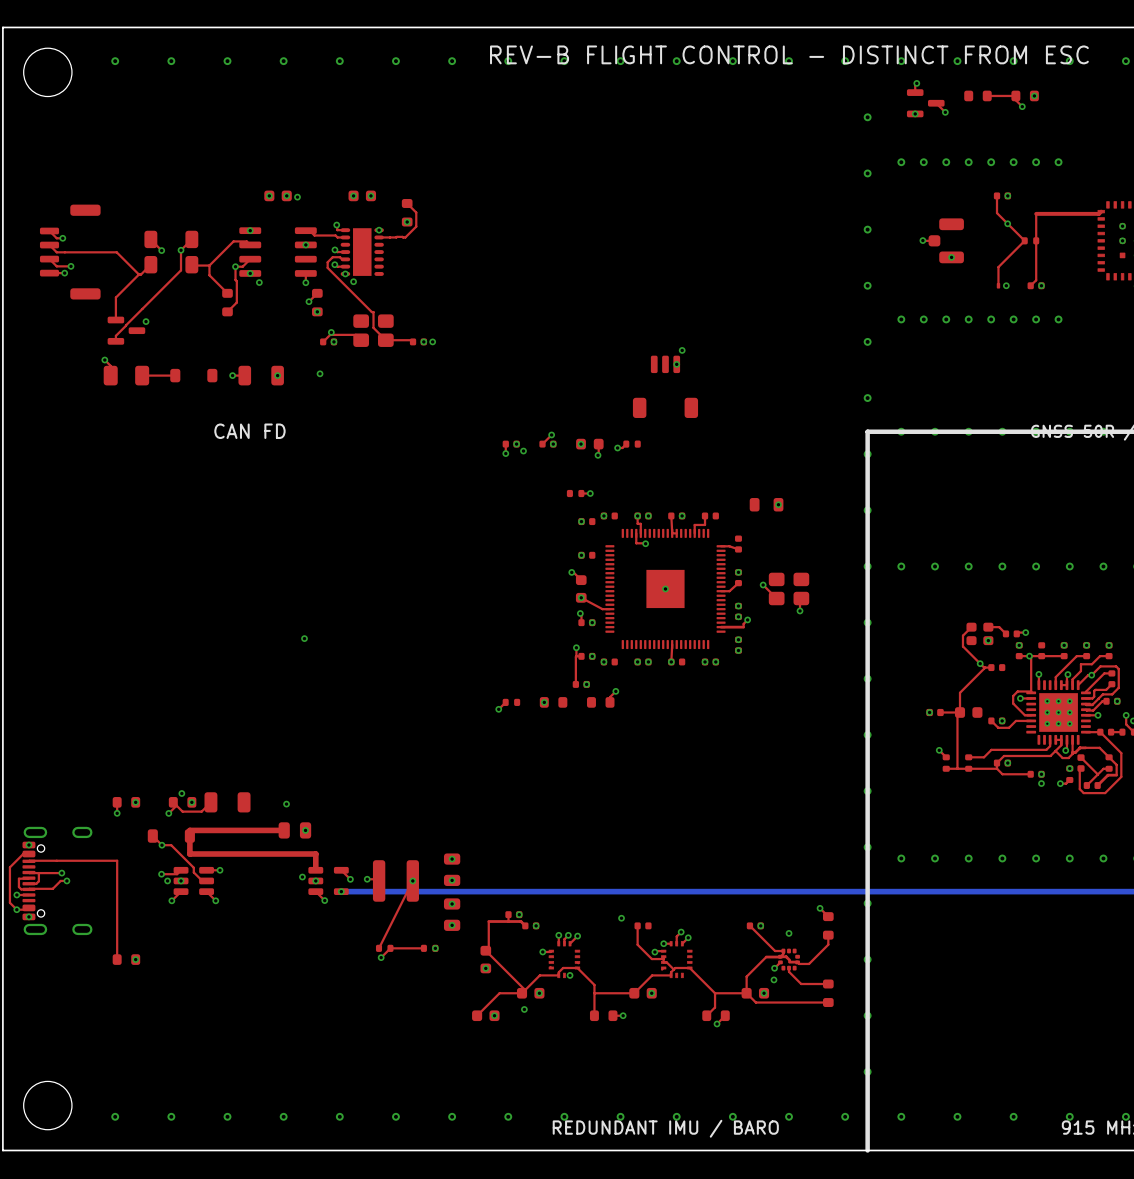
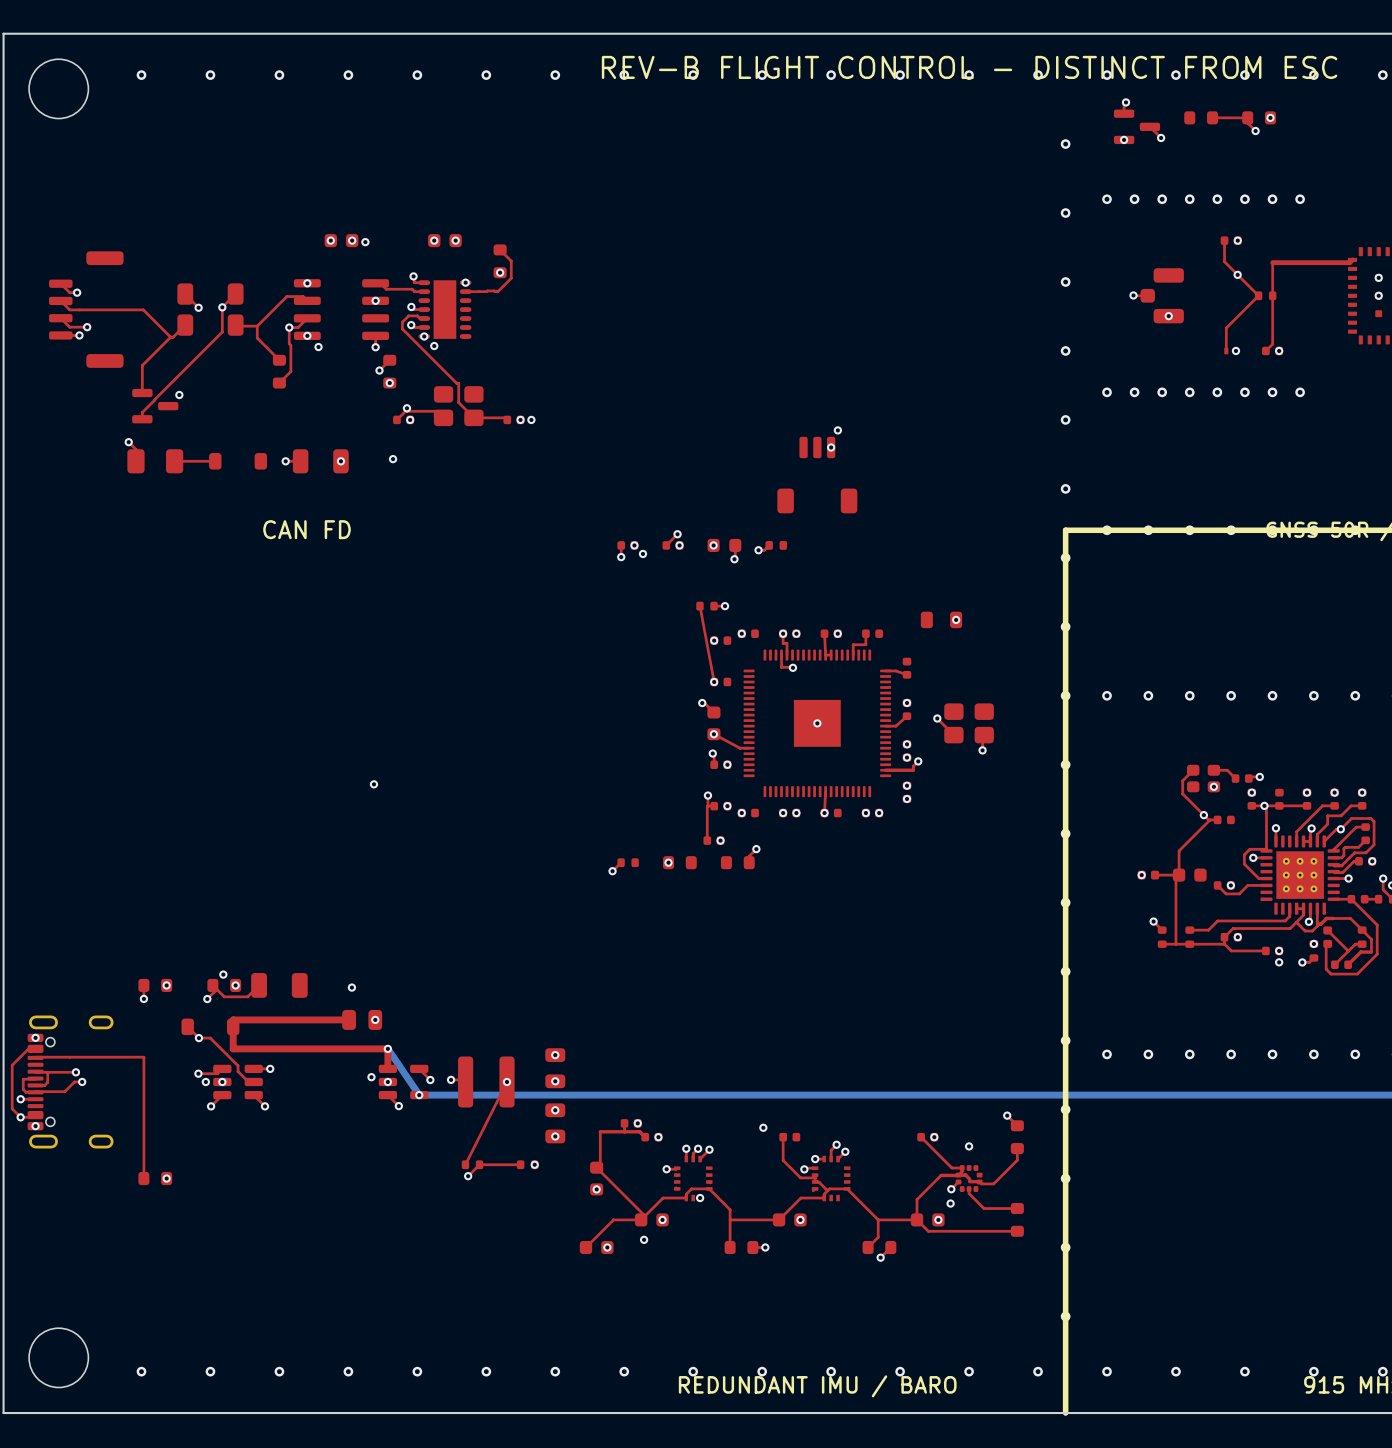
top track: none -> (699, 606) (714, 681)
bottom track: none -> (387, 1048) (419, 1095)
via: none -> (387, 1048)

